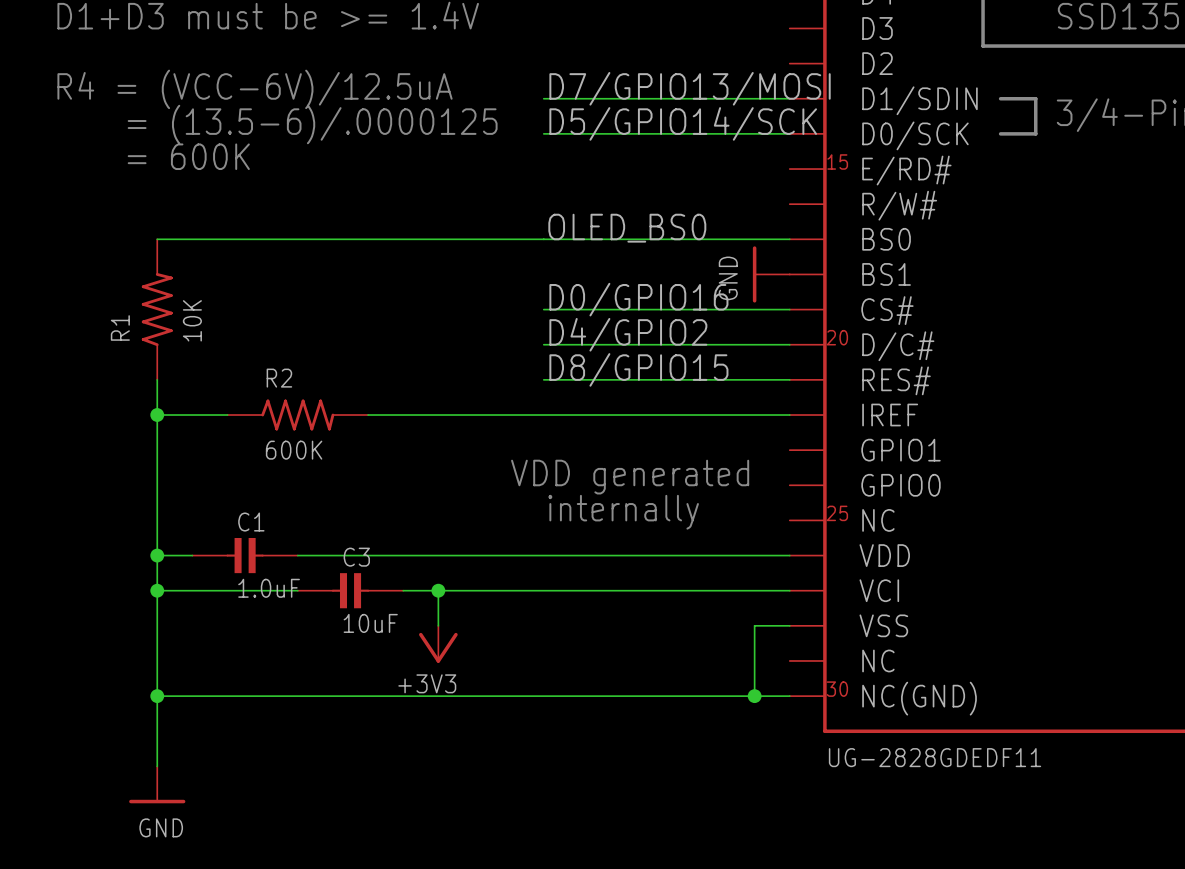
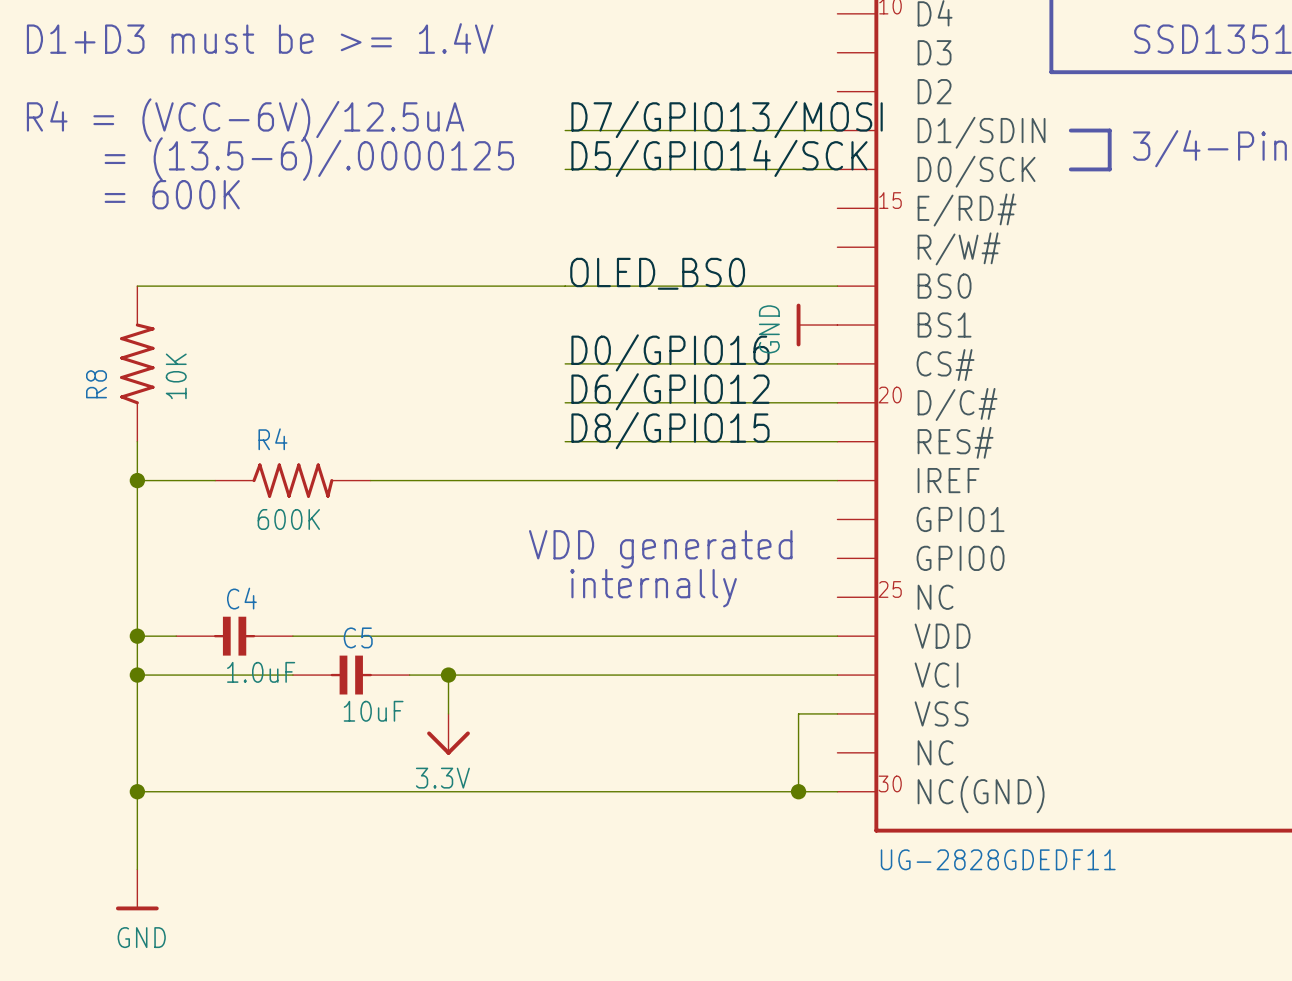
power symbol shape: [752, 246, 790, 303] -> [796, 303, 838, 347]
R1 name: R1 (120, 327) -> R8 (96, 384)
label: D4/GPIO2 (628, 334) -> D6/GPIO12 (670, 391)
R2 name: R2 (279, 378) -> R4 (272, 439)
C1 name: C1 (251, 522) -> C4 (241, 598)
C3 name: C3 (356, 557) -> C5 (358, 637)
power symbol: +3V3 (438, 644) -> 3.3V (448, 734)
power symbol shape: [129, 766, 186, 804] -> [115, 869, 159, 911]

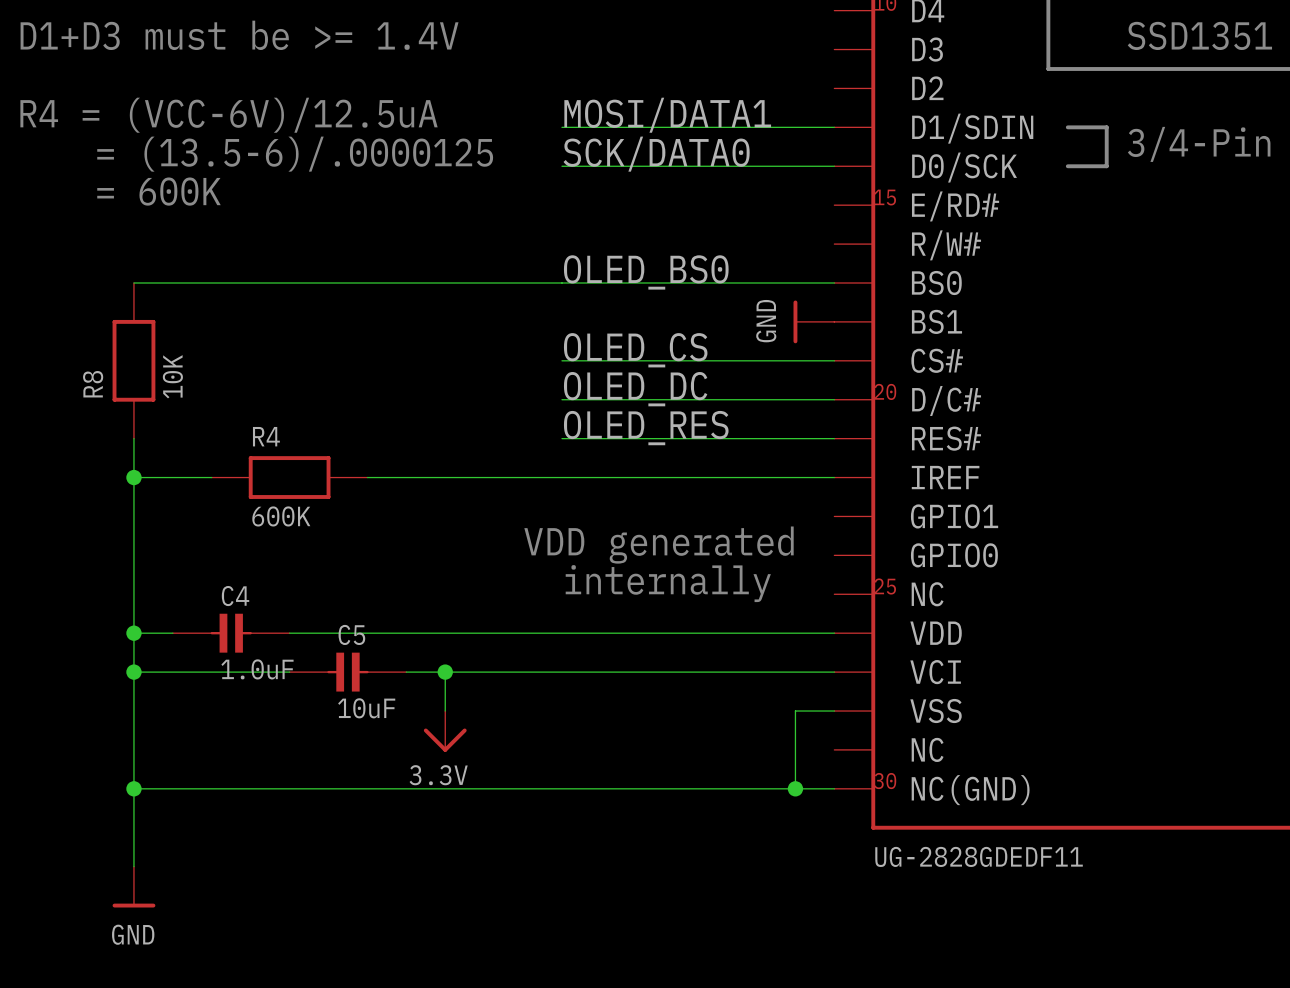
label: D7/GPIO13/MOSI (727, 119) -> MOSI/DATA1 (667, 115)
label: D5/GPIO14/SCK (719, 158) -> SCK/DATA0 (656, 154)
R8 symbol: [120, 286, 155, 442] -> [112, 282, 156, 439]
label: D0/GPIO16 (670, 352) -> OLED_CS (635, 350)
label: D6/GPIO12 (670, 391) -> OLED_DC (635, 389)
label: D8/GPIO15 (670, 430) -> OLED_RES (646, 428)
R4 symbol: [215, 463, 371, 498] -> [211, 456, 368, 499]

